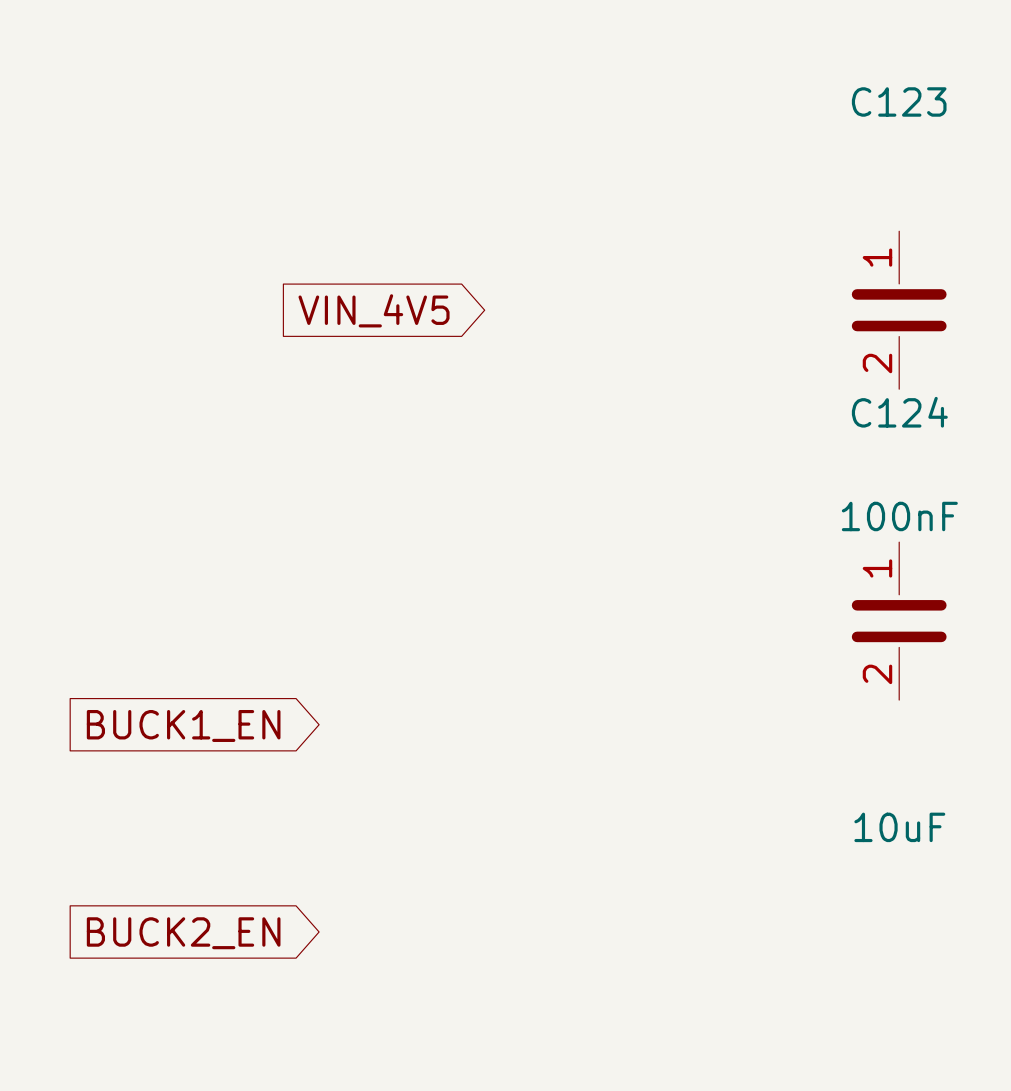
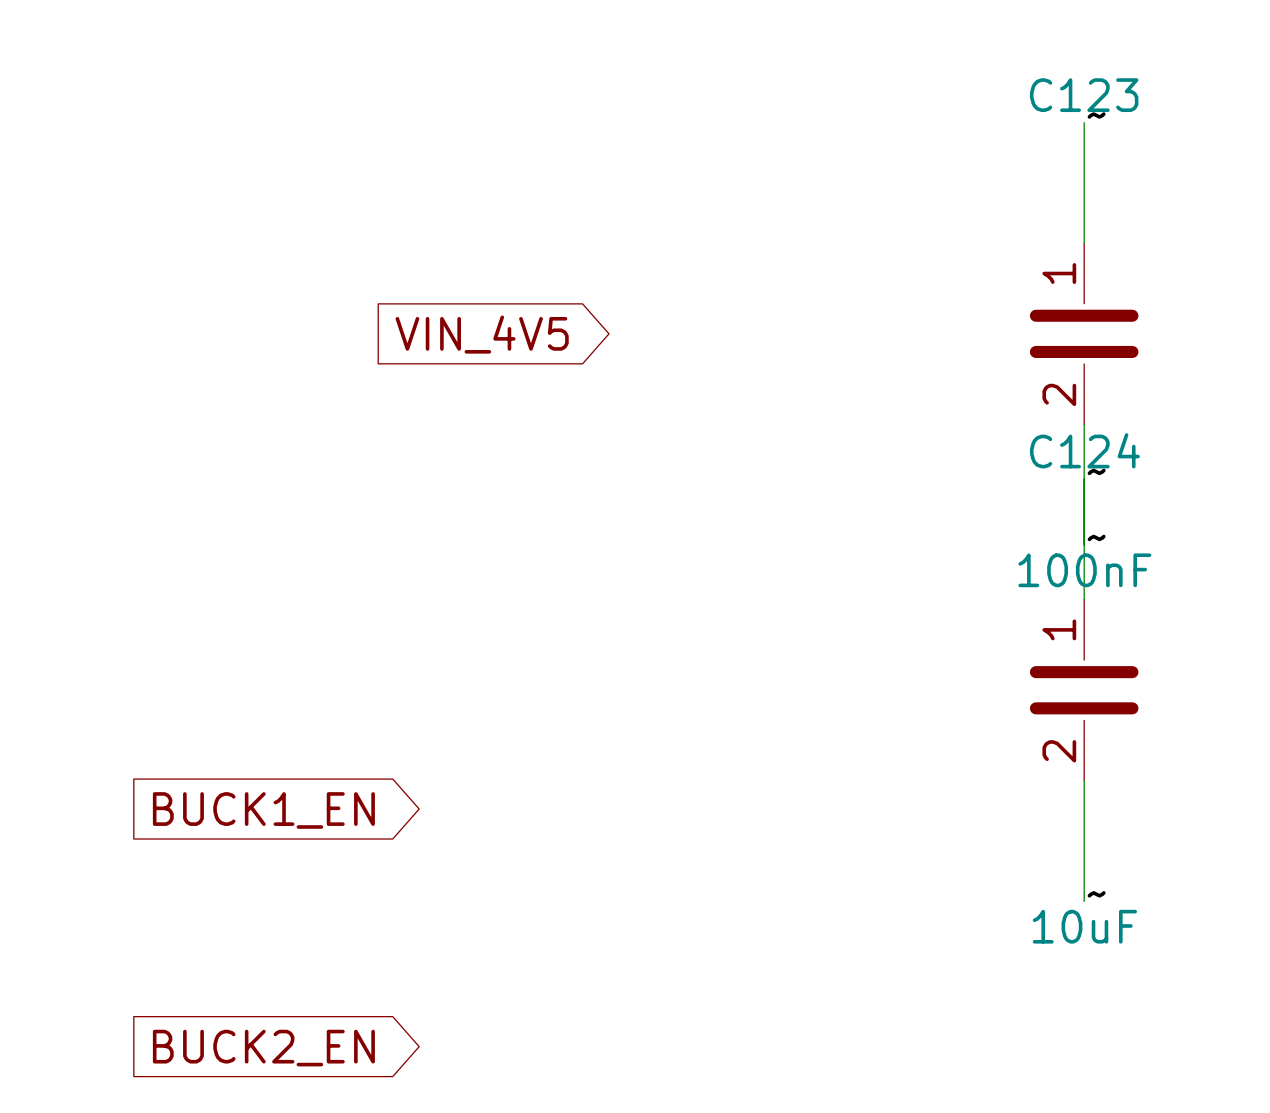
label: none -> ~ (1096, 115)
wire: none -> (1084, 122) (1084, 243)
wire: none -> (1084, 424) (1084, 599)
label: none -> ~ (1096, 471)
label: none -> ~ (1096, 537)
wire: none -> (1084, 780) (1084, 901)
label: none -> ~ (1096, 894)

